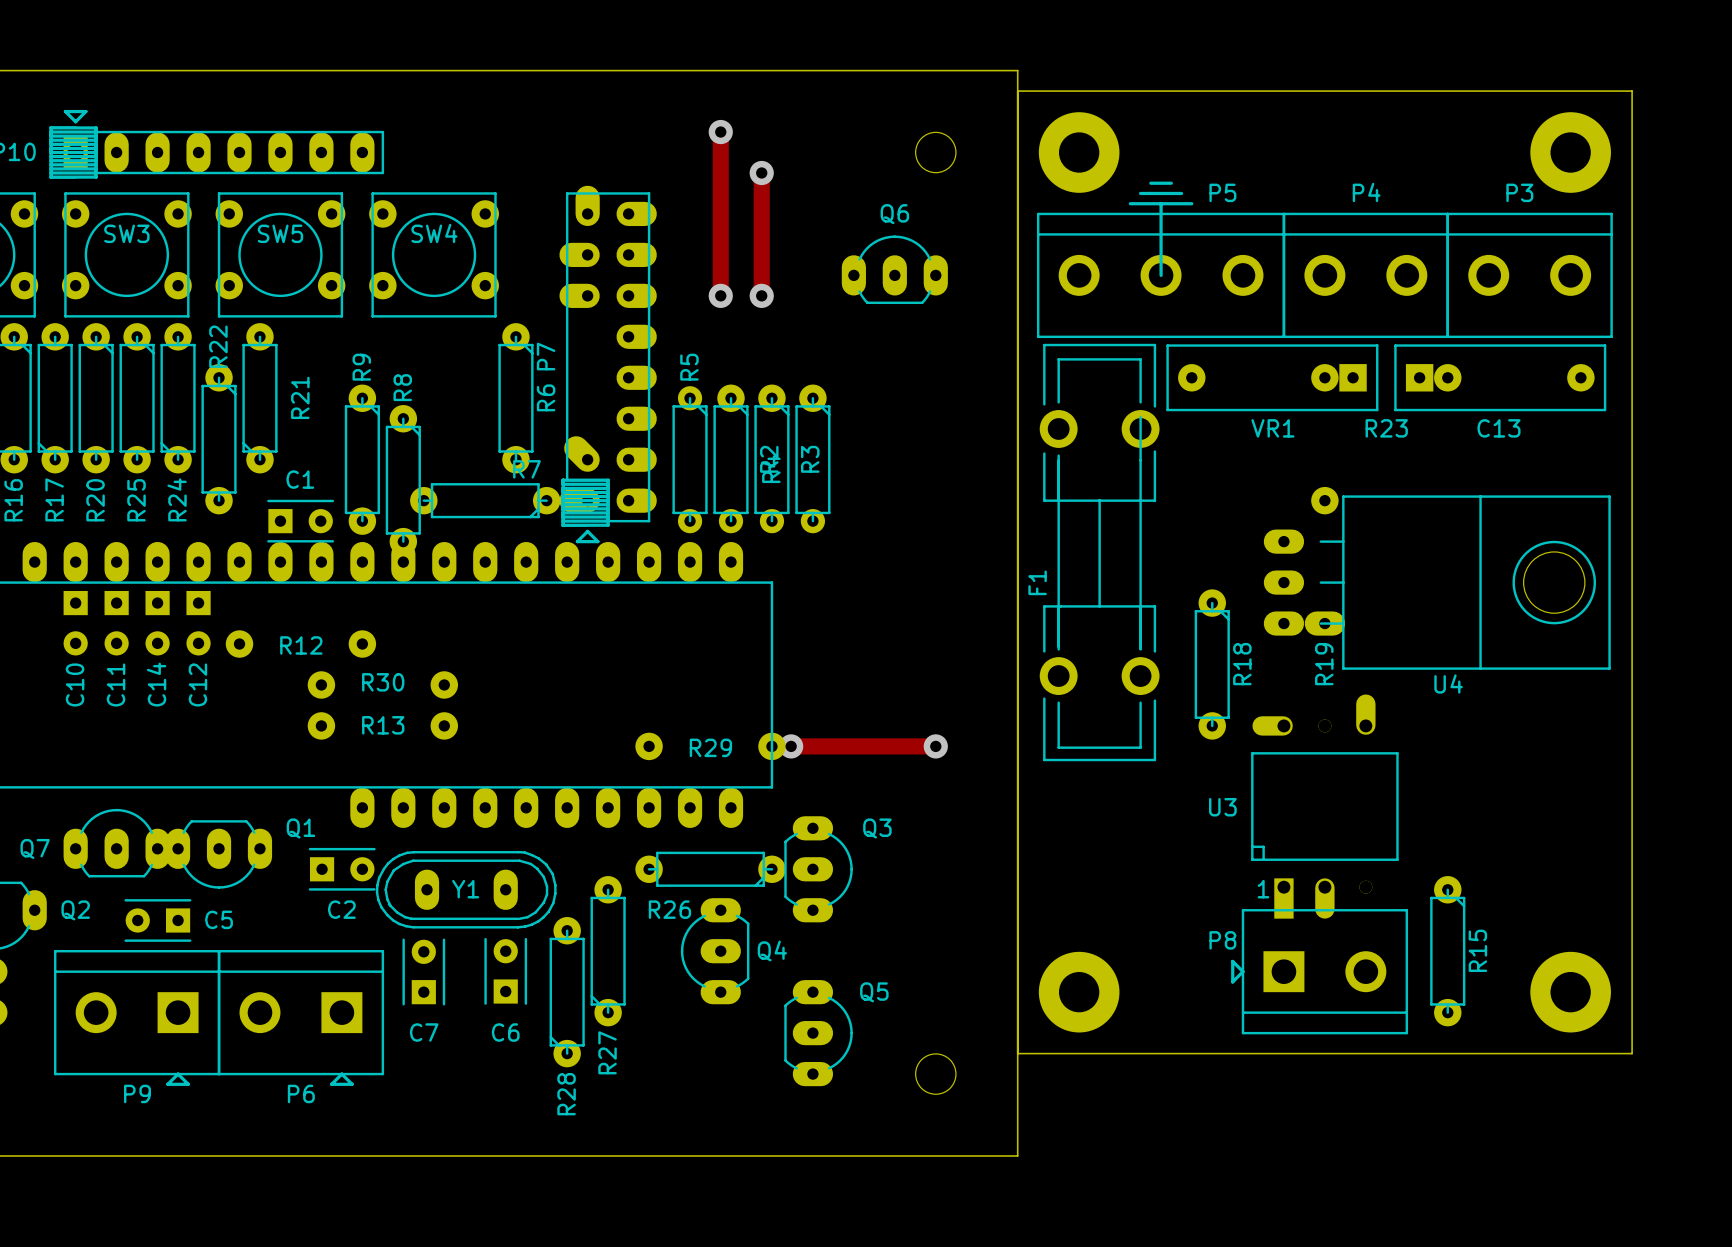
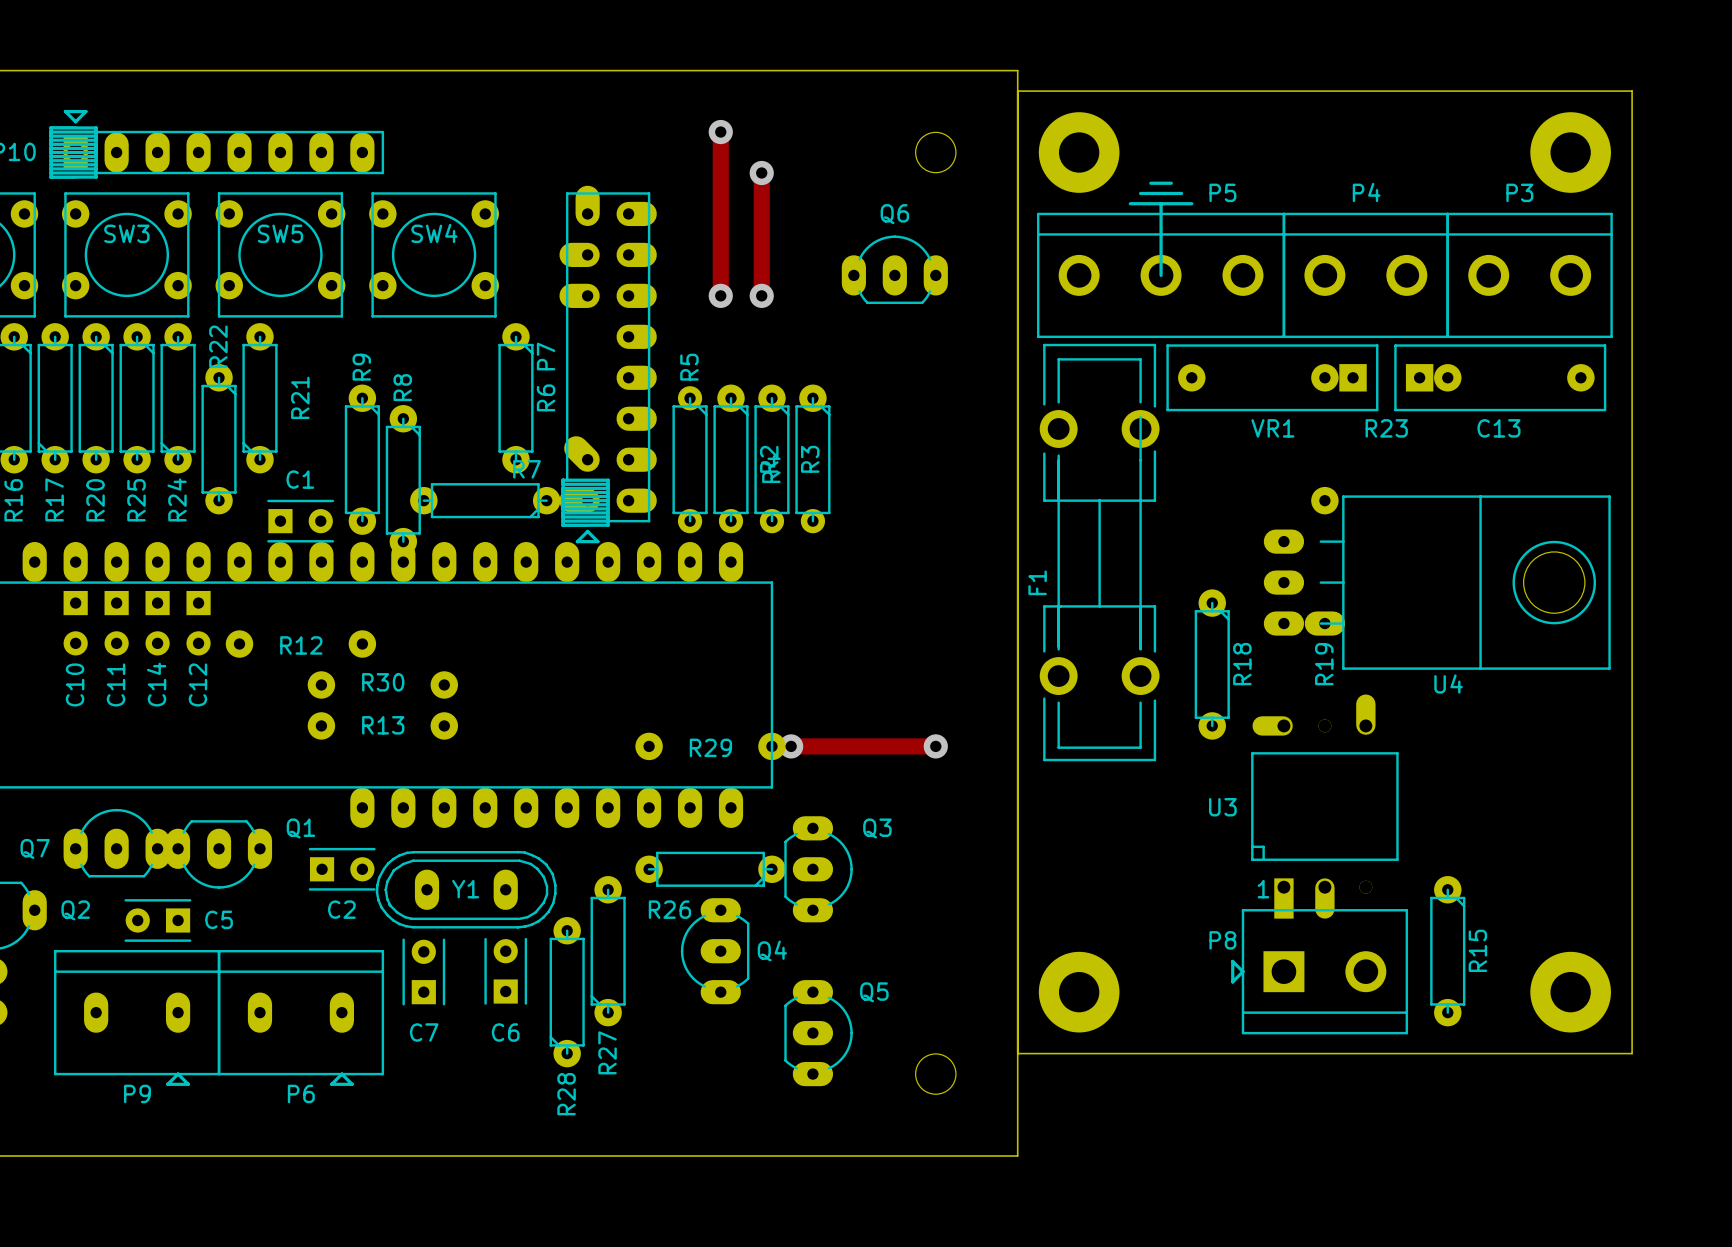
P9 footprint: [53, 949, 221, 1076] -> [53, 949, 221, 1076]
P6 footprint: [217, 949, 385, 1076] -> [217, 949, 385, 1076]

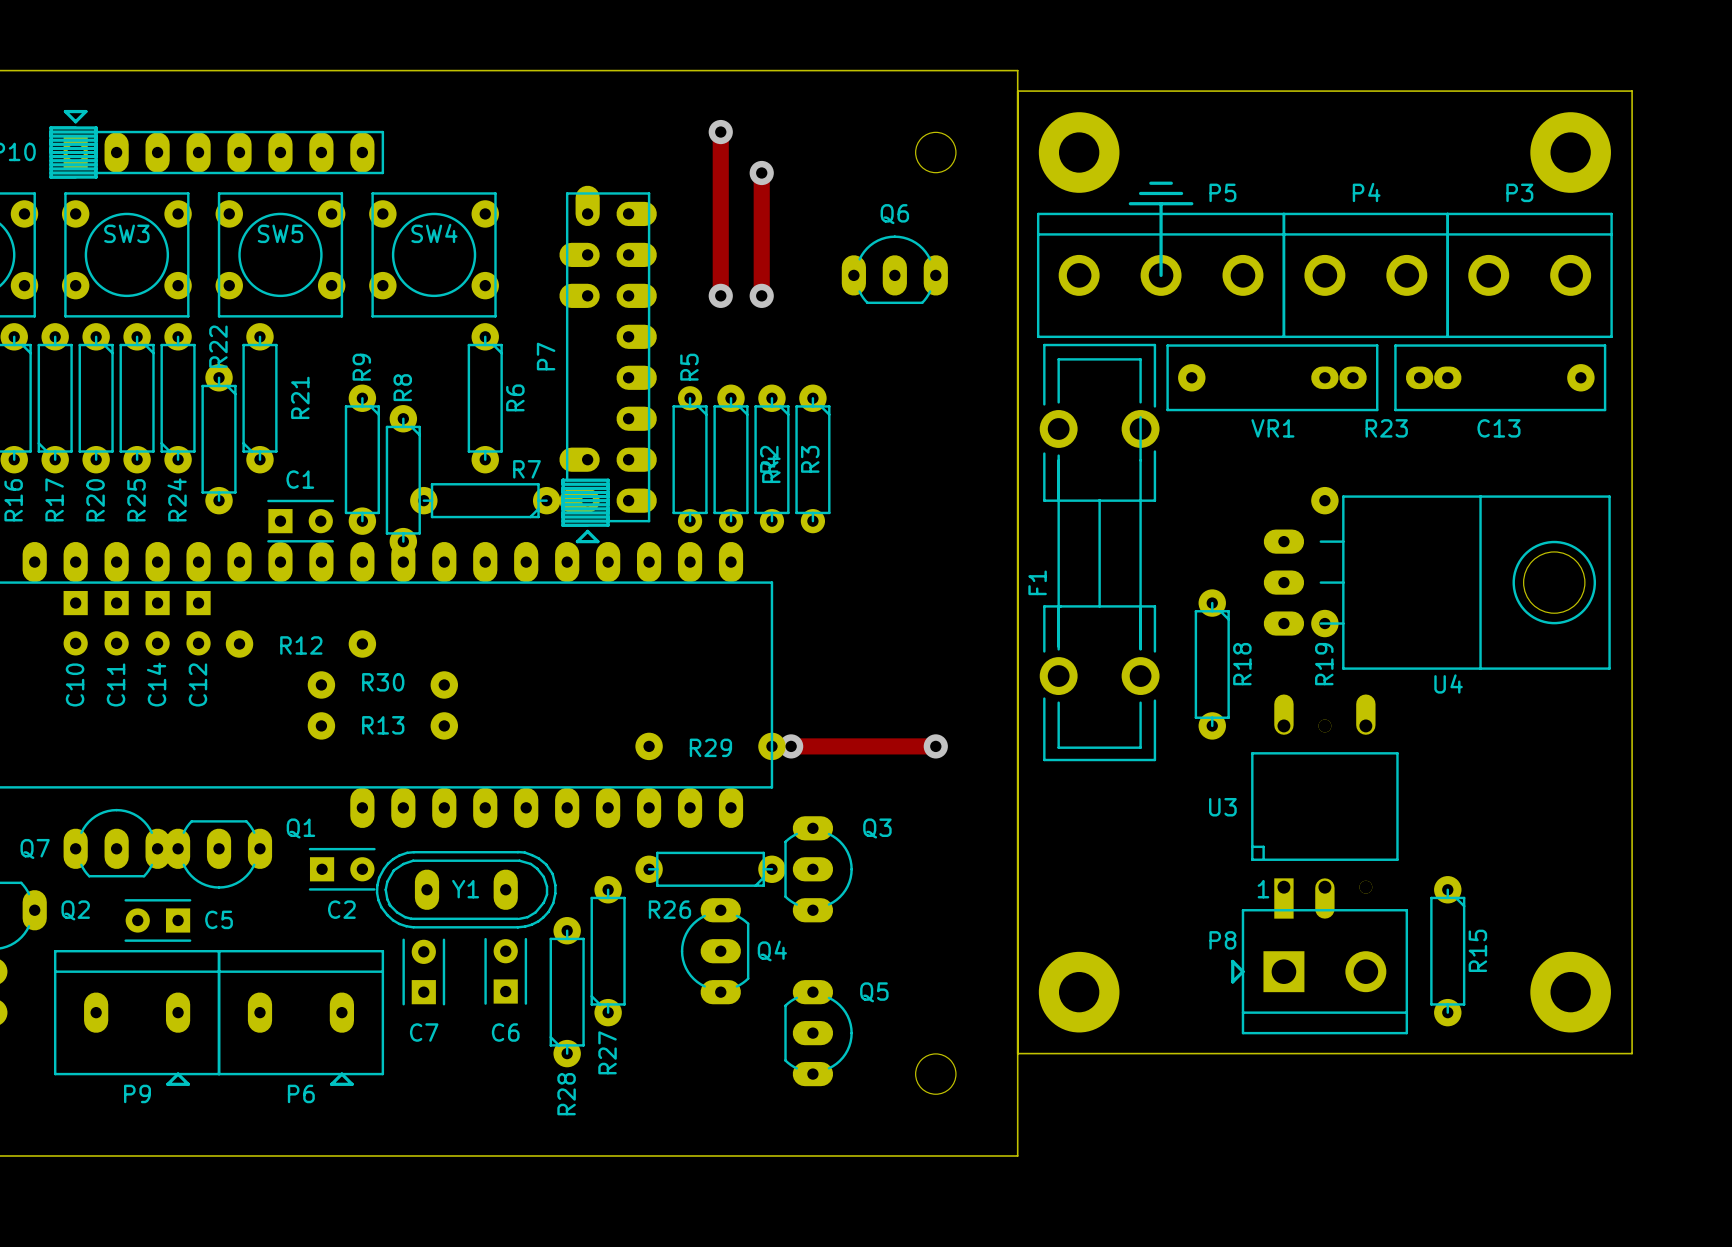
P7 footprint: [559, 185, 657, 527] -> [559, 185, 657, 527]
VR1 footprint: [1166, 344, 1379, 412] -> [1166, 344, 1379, 412]
C13 footprint: [1394, 344, 1607, 412] -> [1394, 344, 1607, 412]
R23 footprint: [1311, 364, 1462, 392] -> [1311, 366, 1462, 390]
R6 position: (515, 398) -> (485, 398)
R19 footprint: [1304, 486, 1346, 636] -> [1311, 486, 1339, 638]
U3 footprint: [1251, 694, 1399, 919] -> [1251, 694, 1399, 919]

